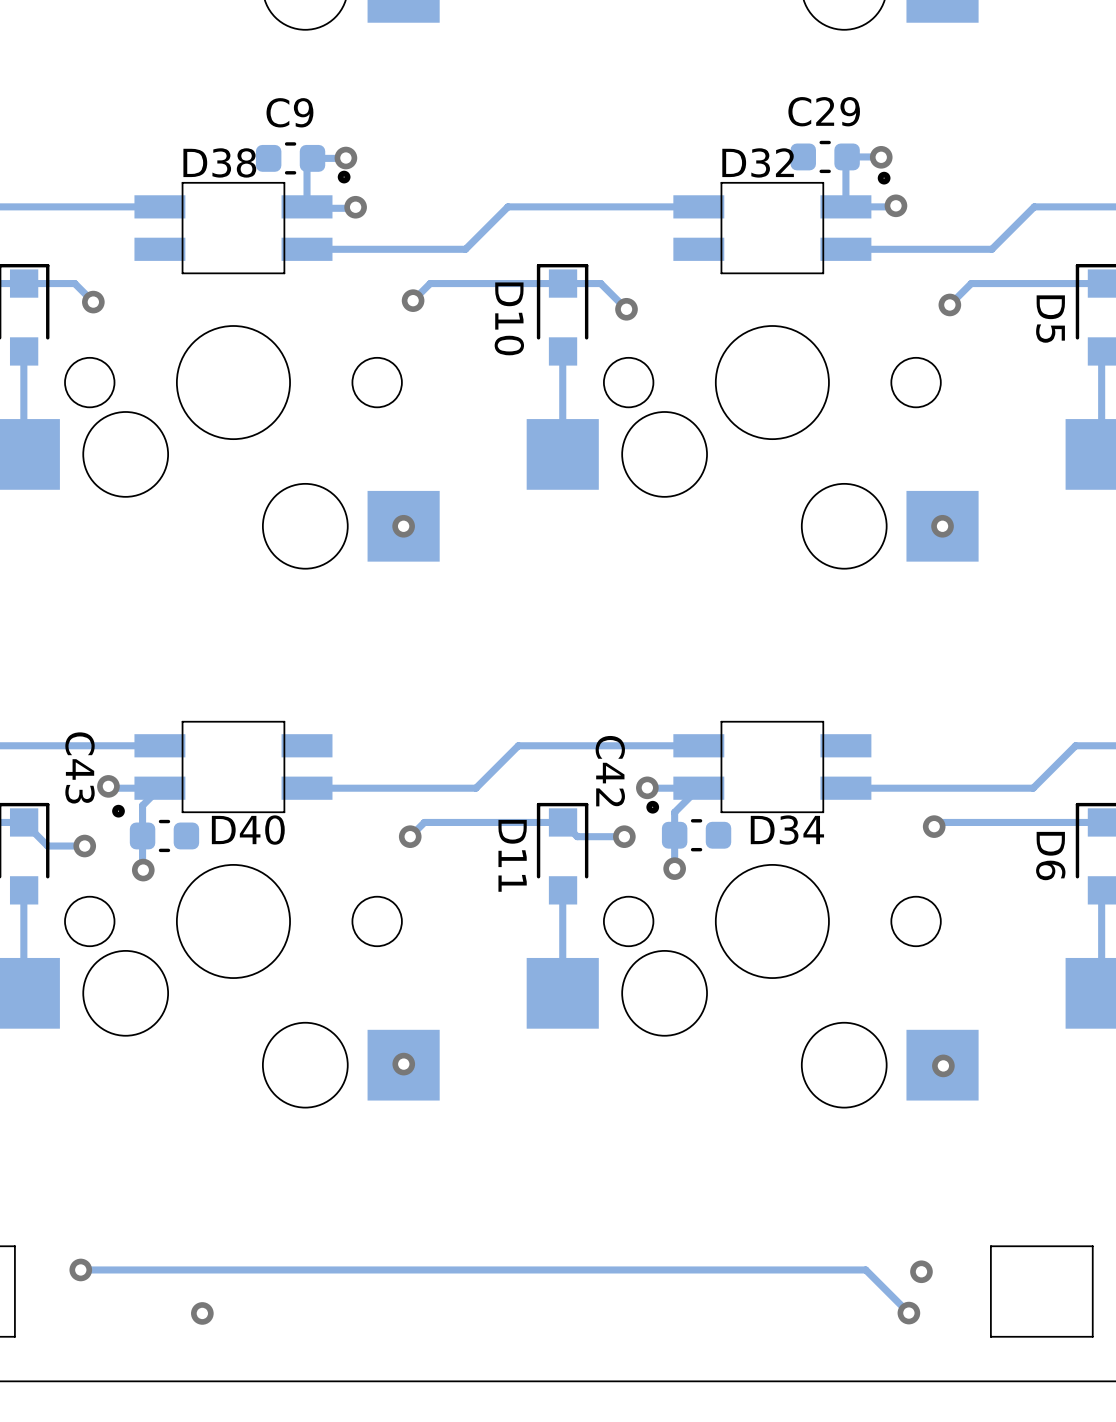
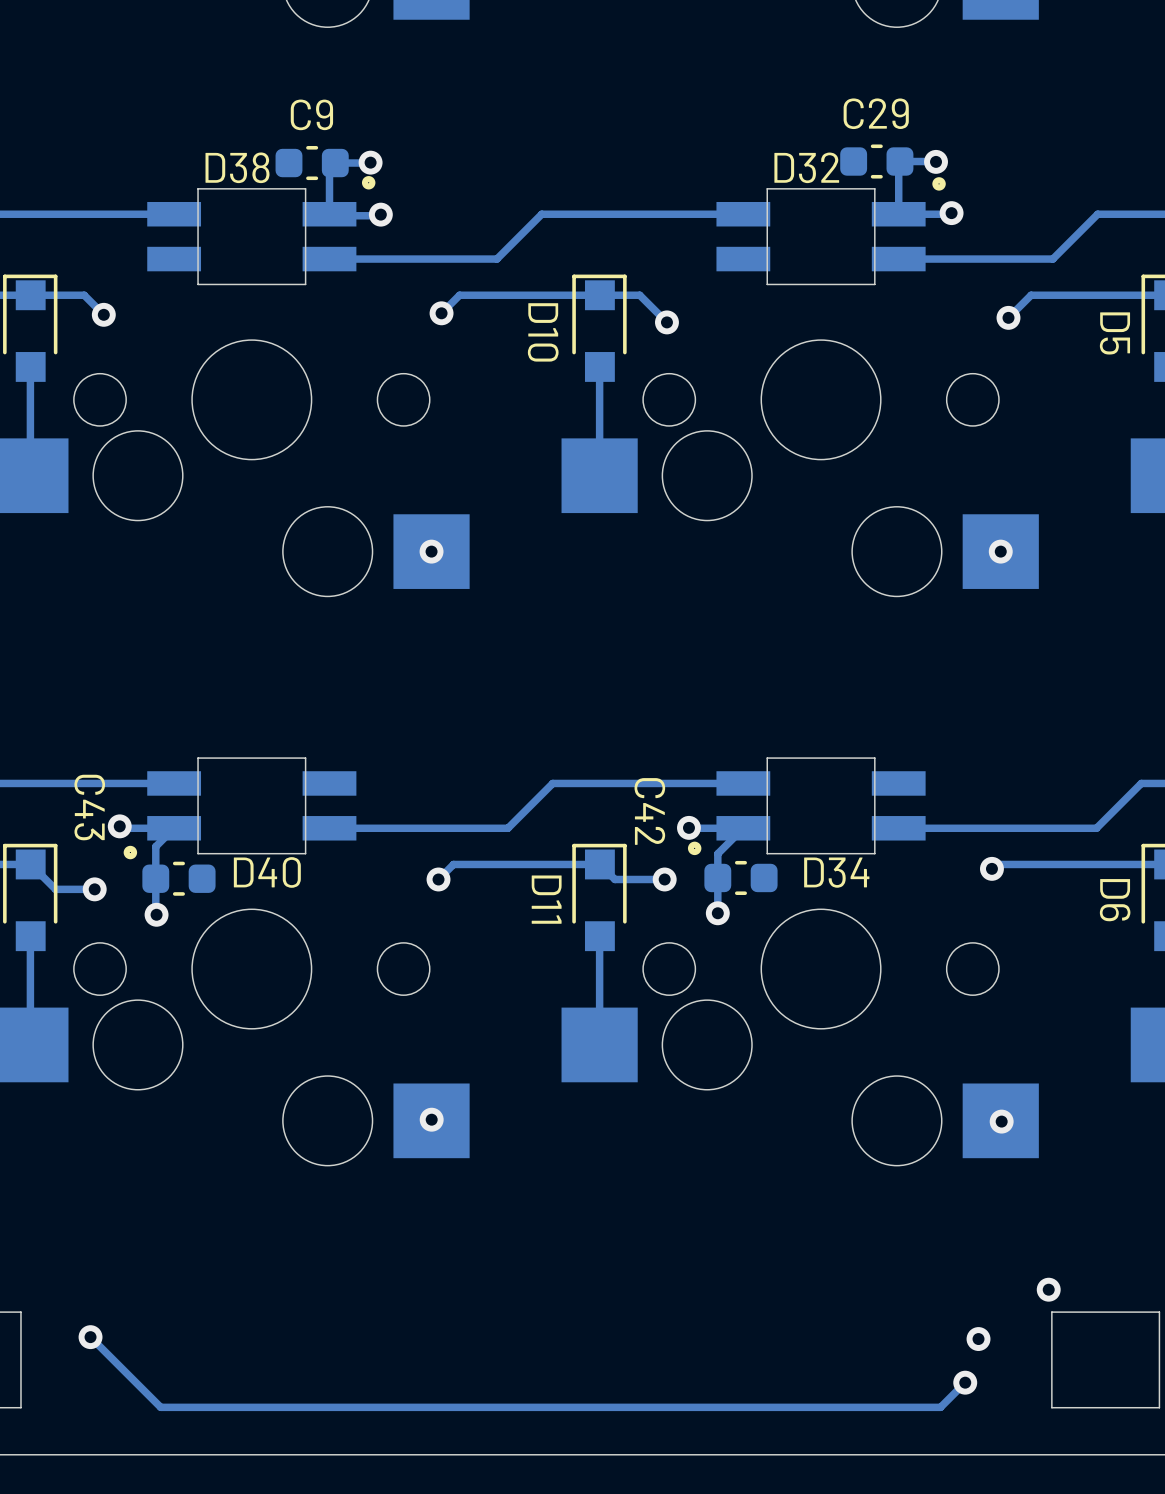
via: none -> (1048, 1289)
track: (80, 1269) (865, 1269) (908, 1313) -> (90, 1337) (160, 1407) (940, 1407) (965, 1382)
via: (202, 1313) -> none

